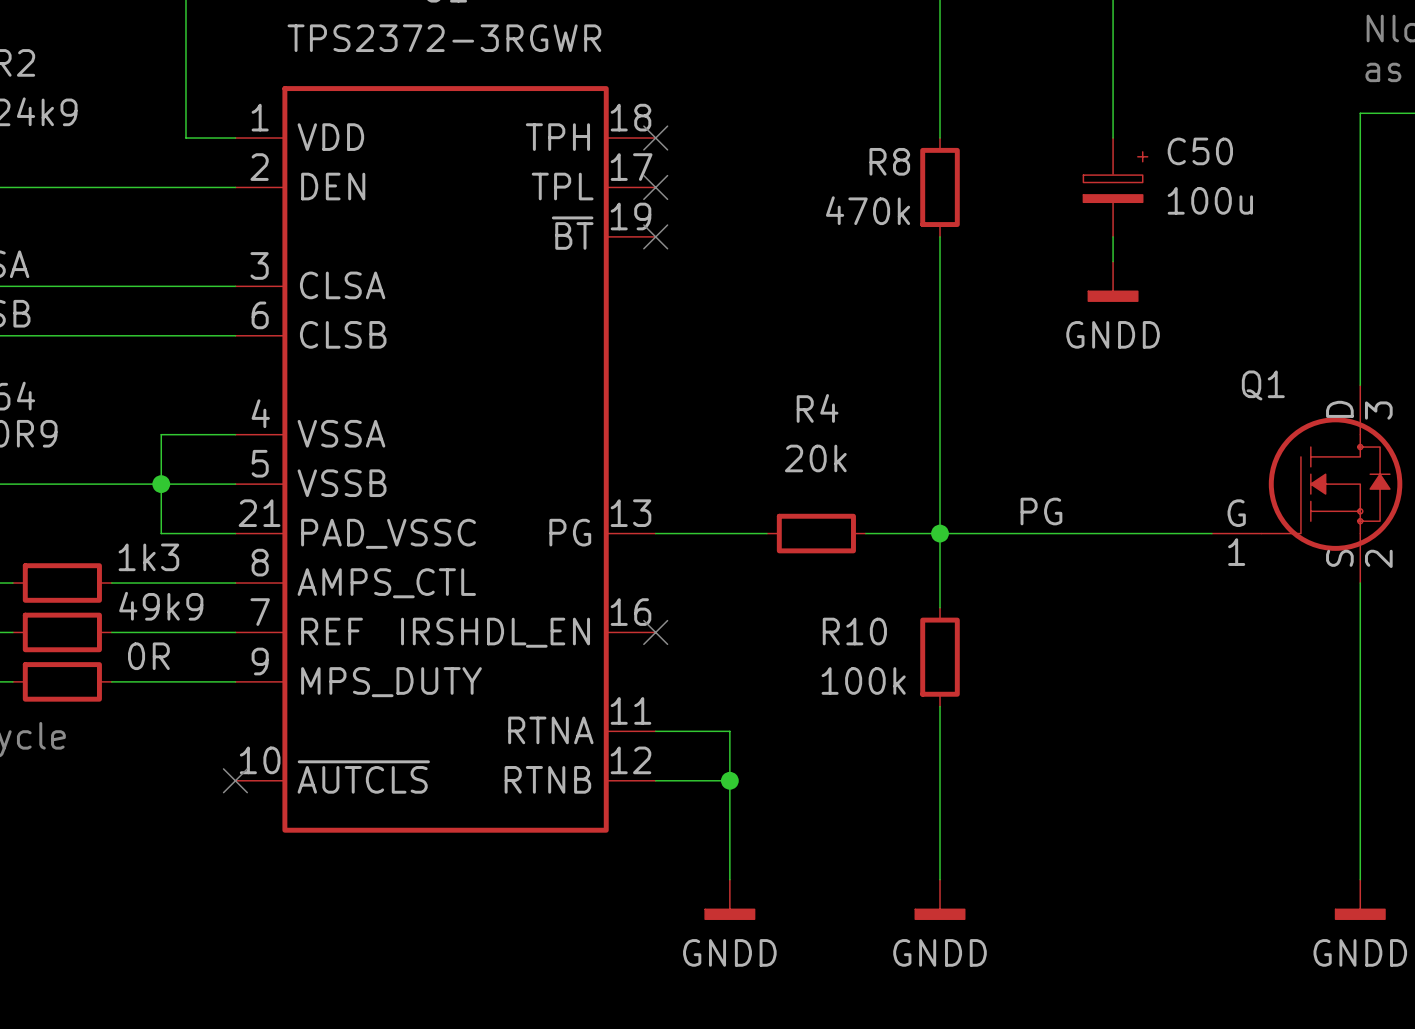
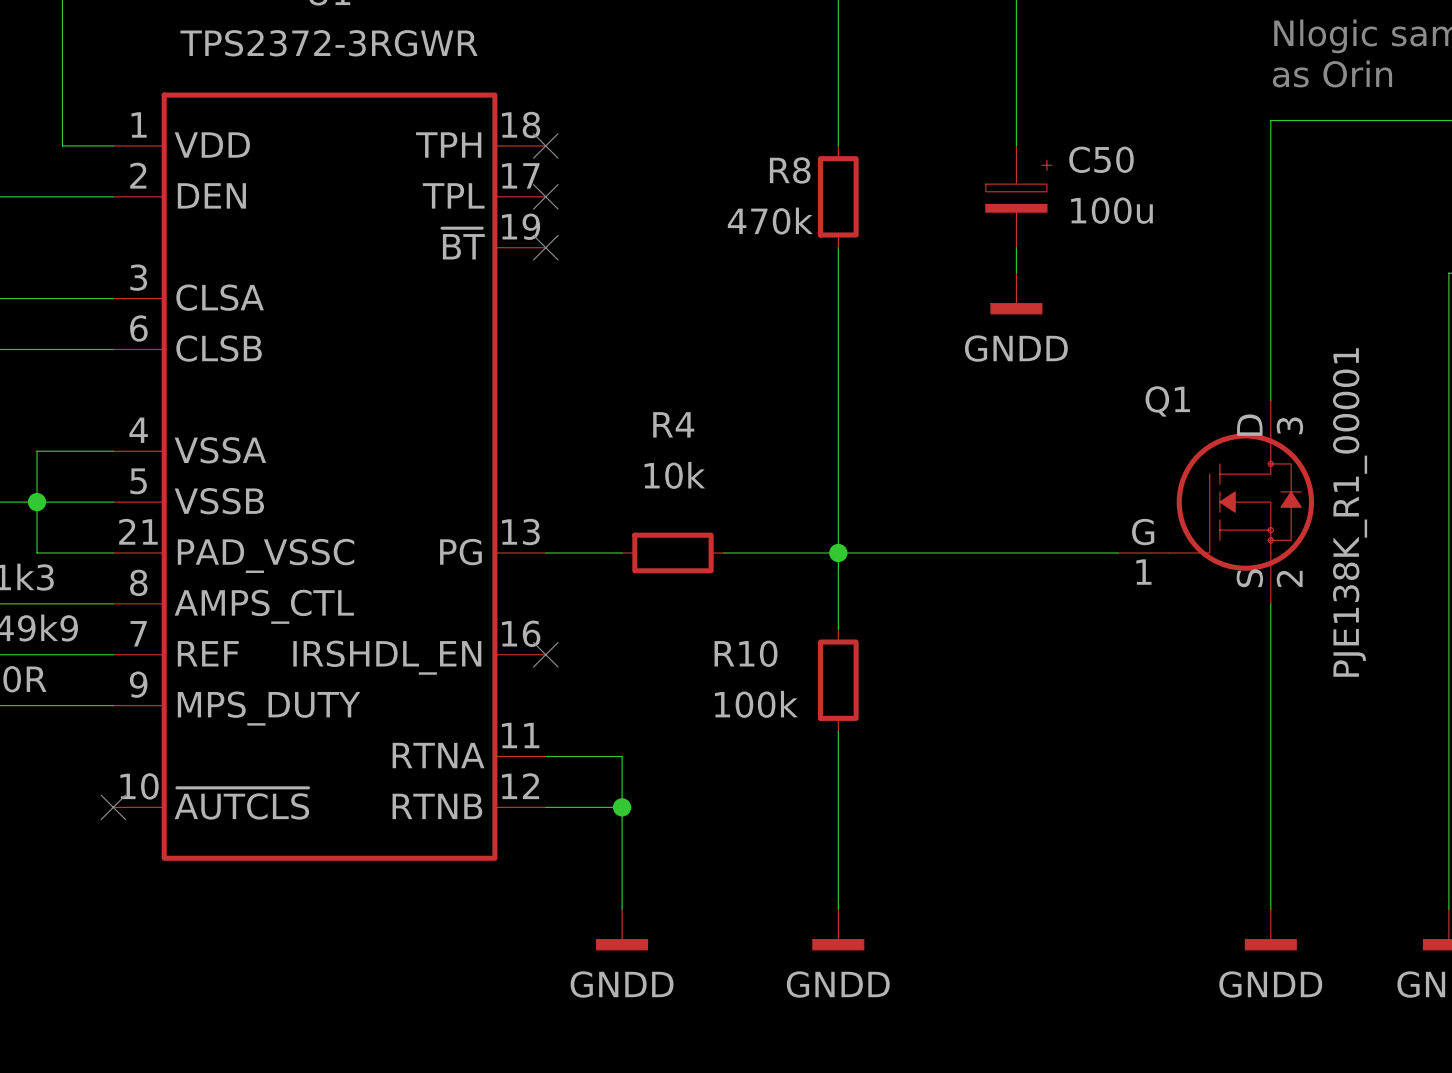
R4 text: 20k (815, 458) -> 10k (674, 475)
label: PG (1041, 511) -> none
wire: (729, 533) (766, 533) -> (723, 552) (762, 552)
R4 position: (816, 533) -> (672, 552)

